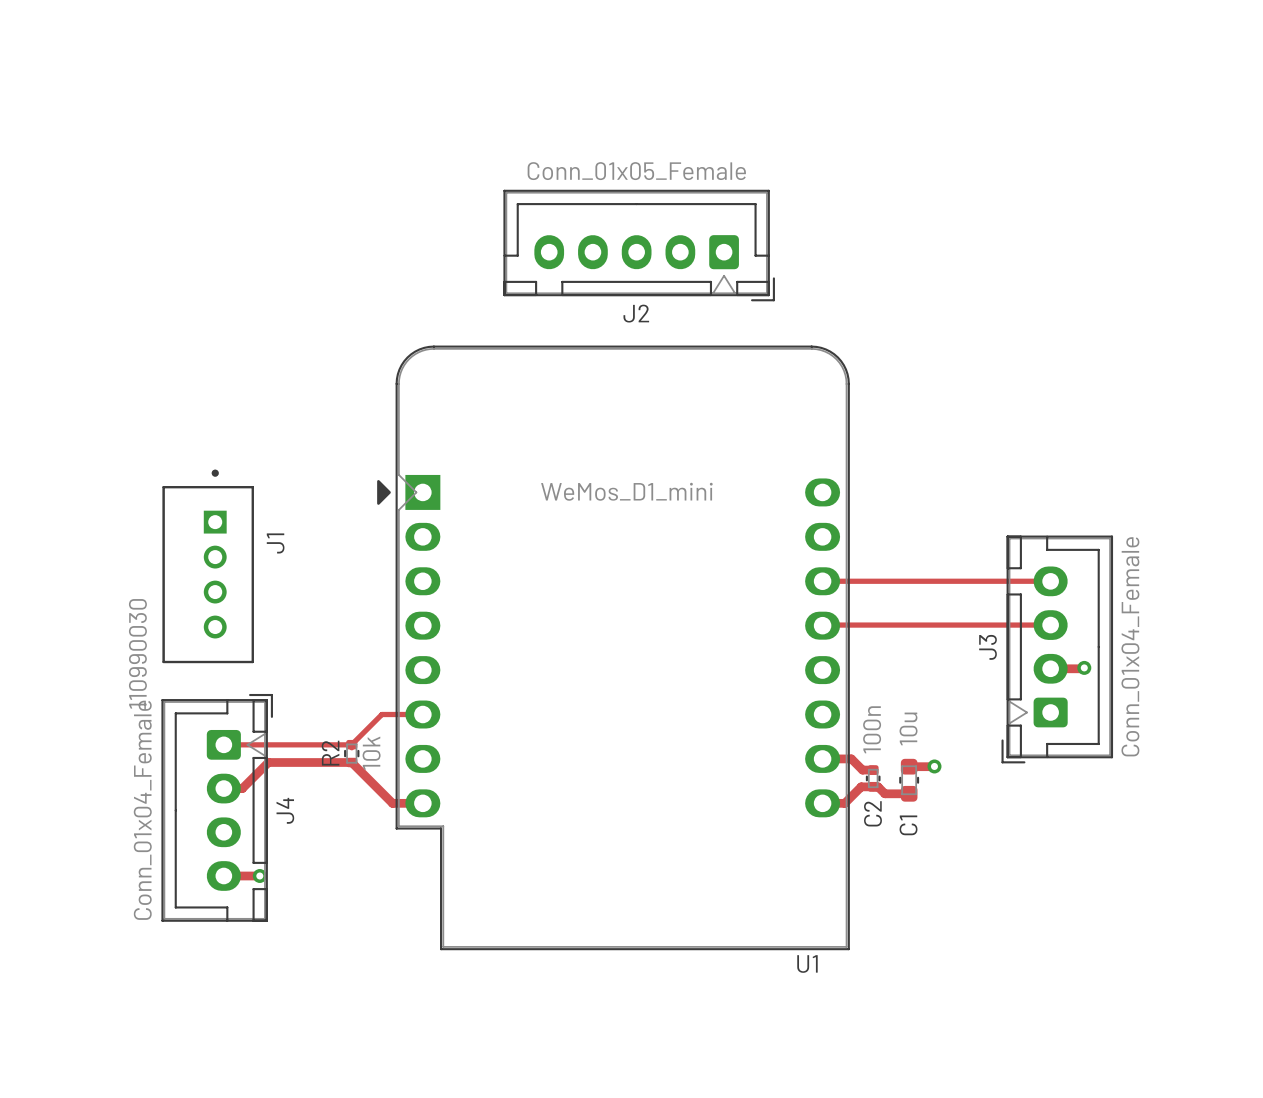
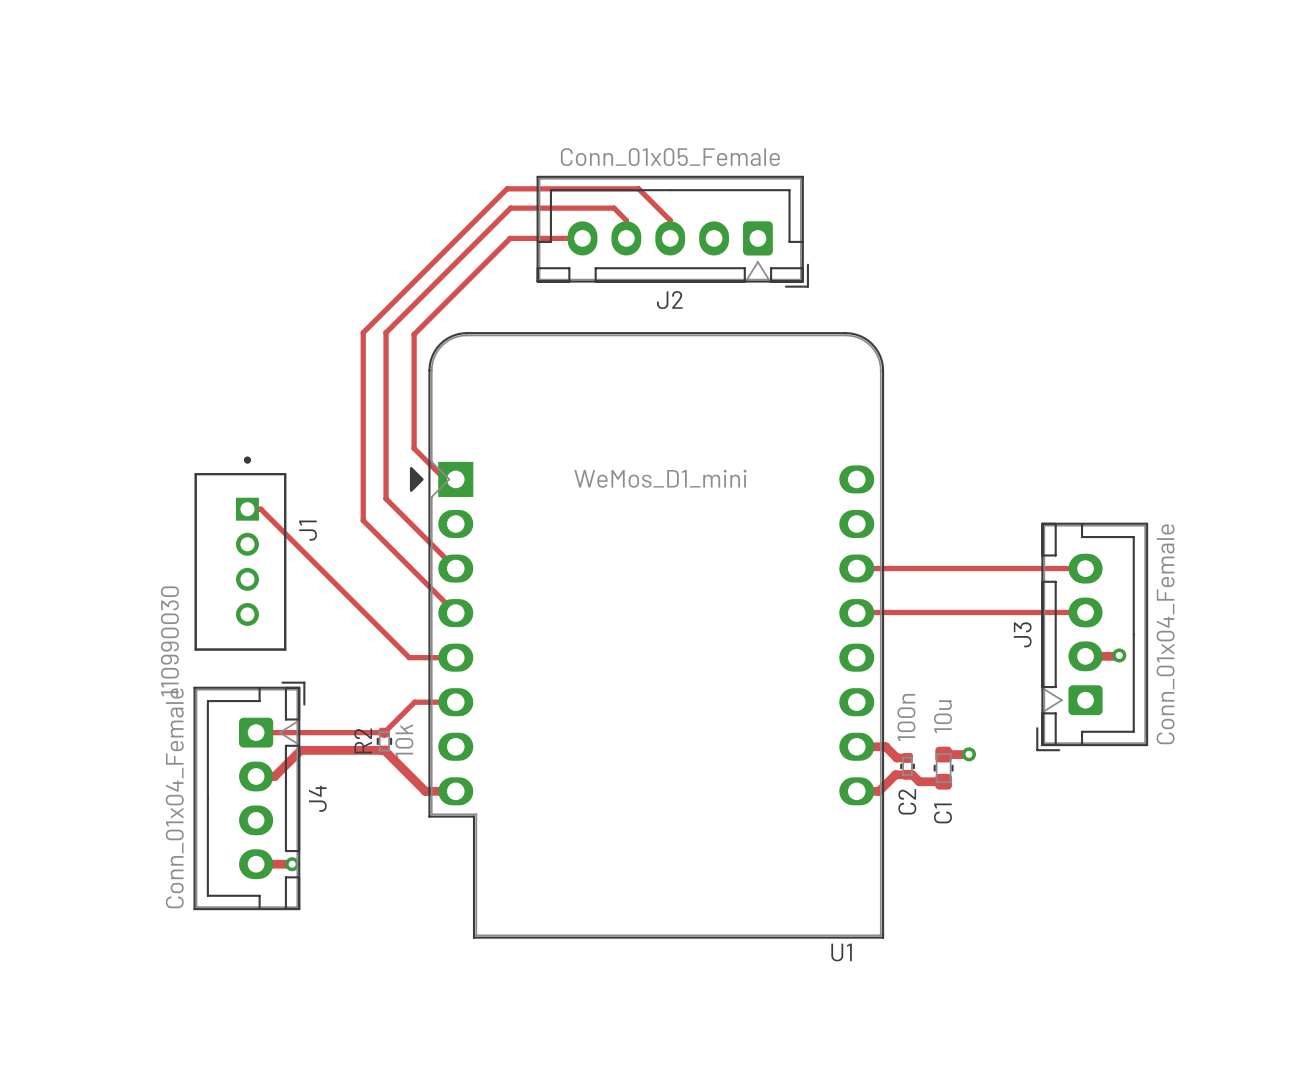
track: none -> (582, 238) (510, 238) (414, 334) (414, 448) (445, 479) (455, 479)
track: none -> (626, 238) (626, 220) (614, 208) (510, 208) (386, 332) (386, 498) (455, 568)
track: none -> (670, 238) (670, 220) (638, 188) (507, 188) (363, 332) (363, 520) (455, 613)
track: none -> (247, 509) (260, 509) (409, 657) (455, 657)

